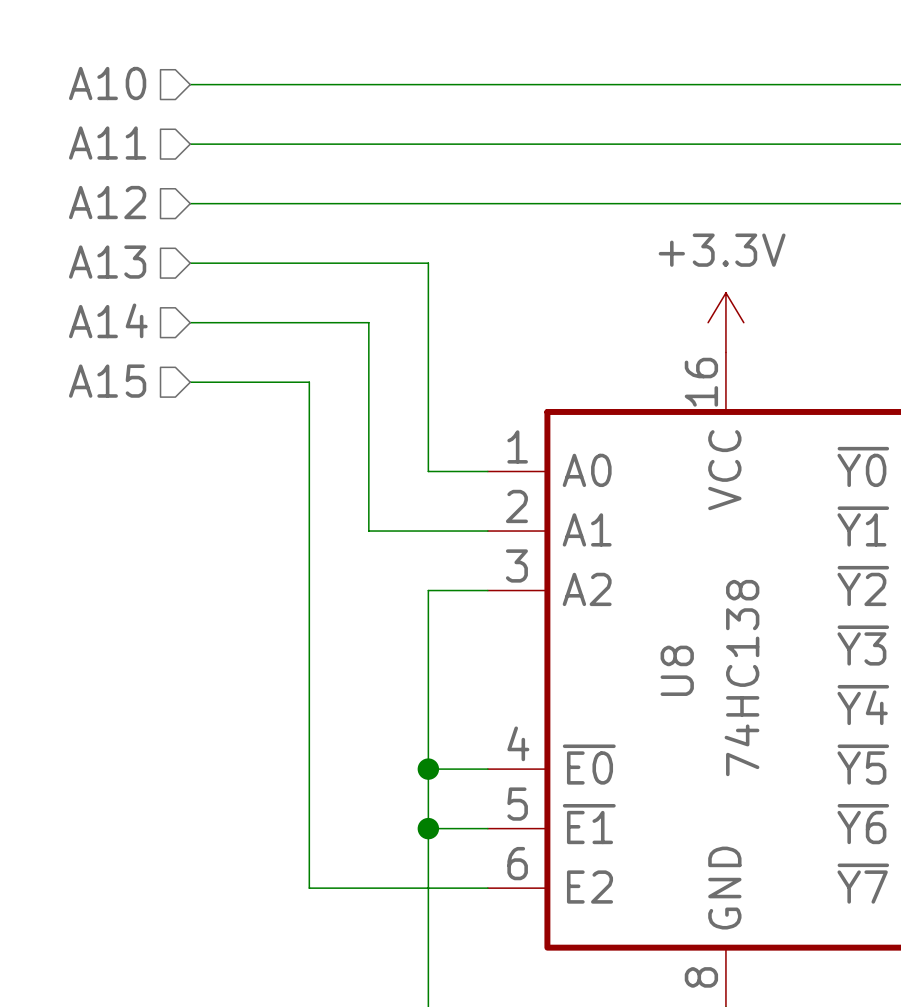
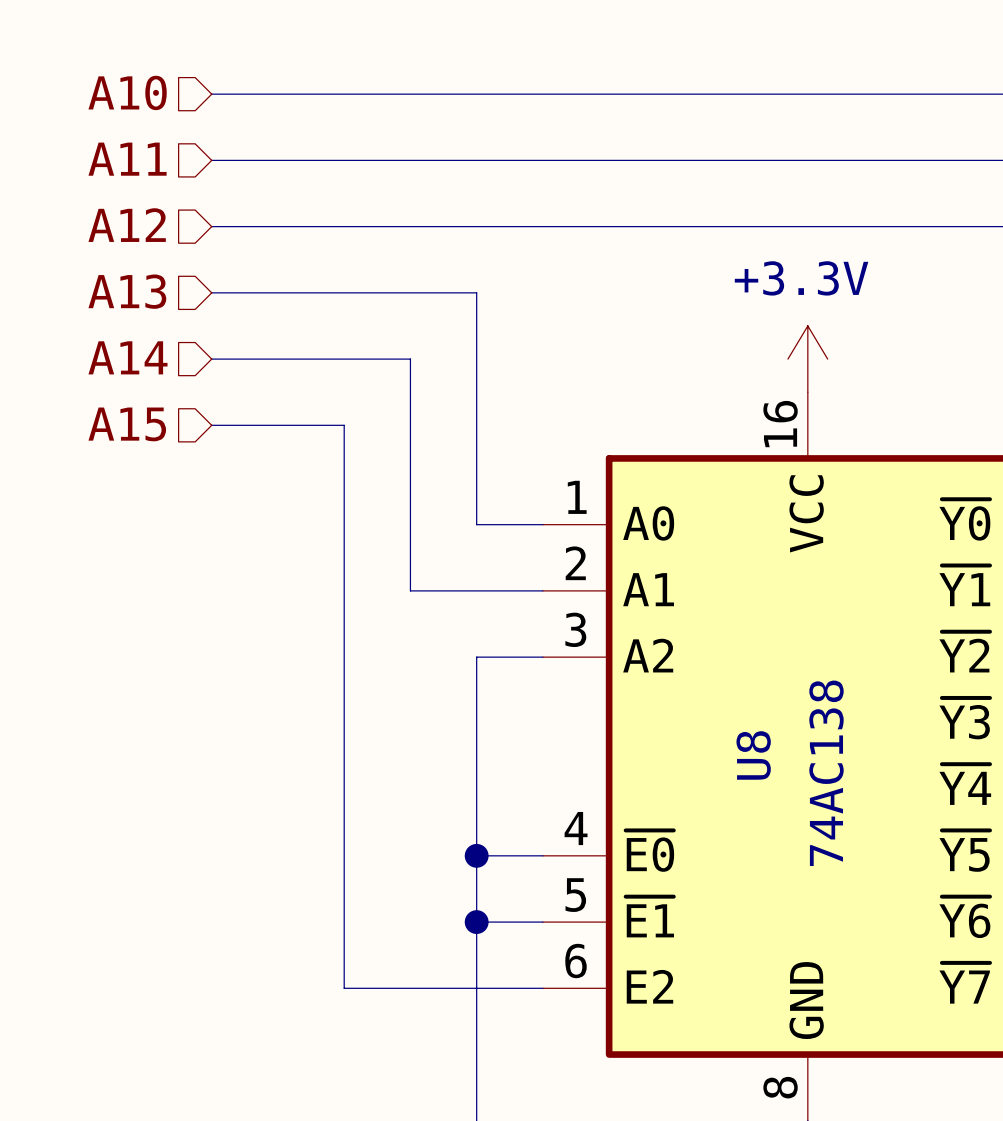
U8 value: 74HC138 (741, 678) -> 74AC138 (826, 773)

